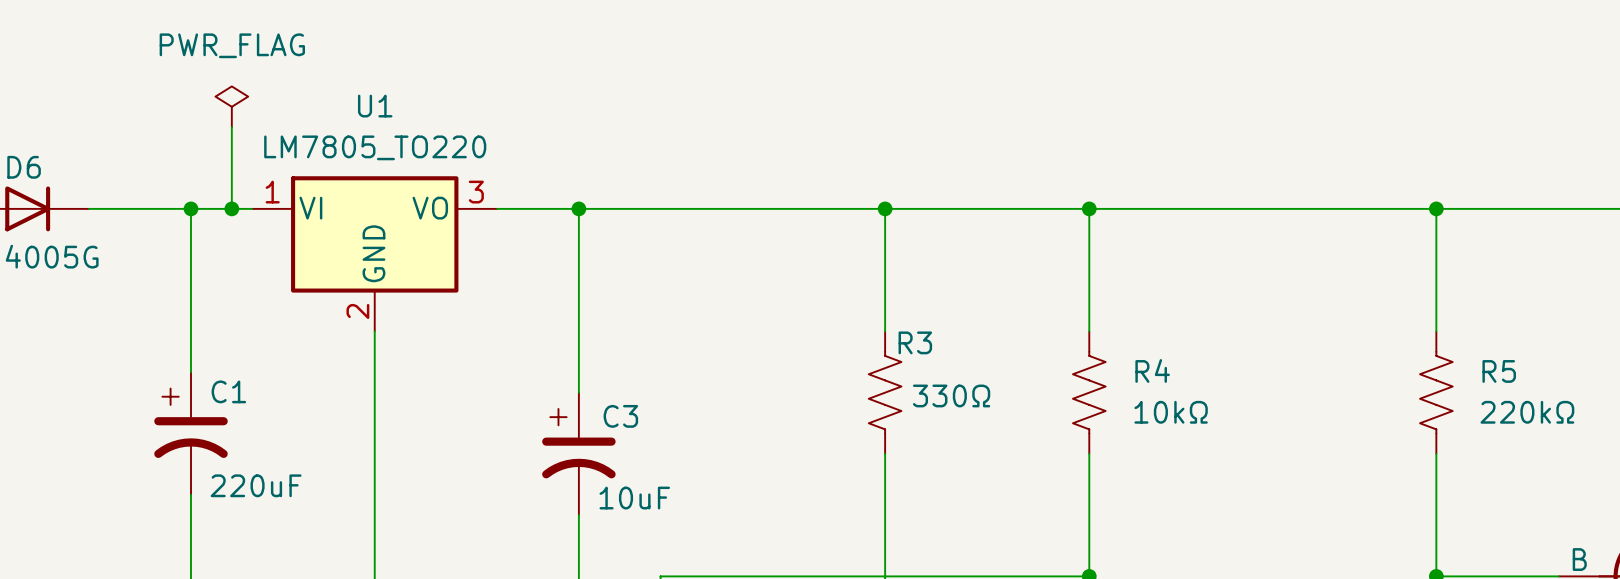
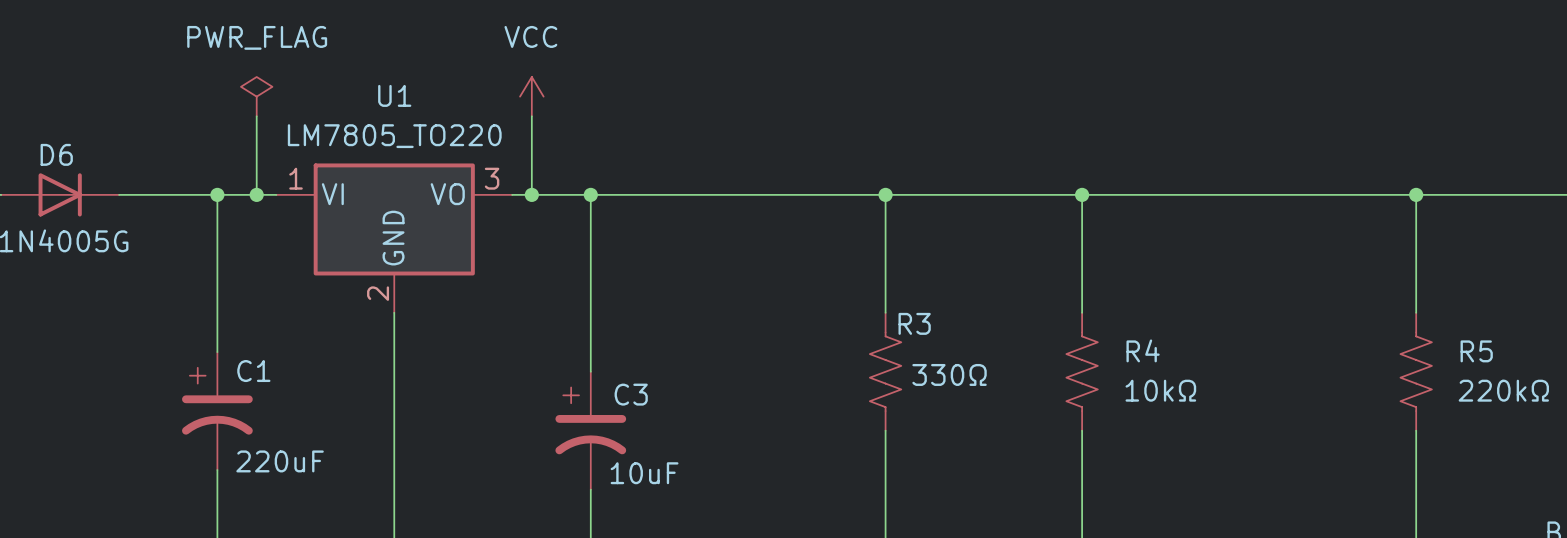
power symbol: none -> VCC (531, 96)
wire: none -> (531, 116) (531, 194)
junction: none -> (531, 194)

